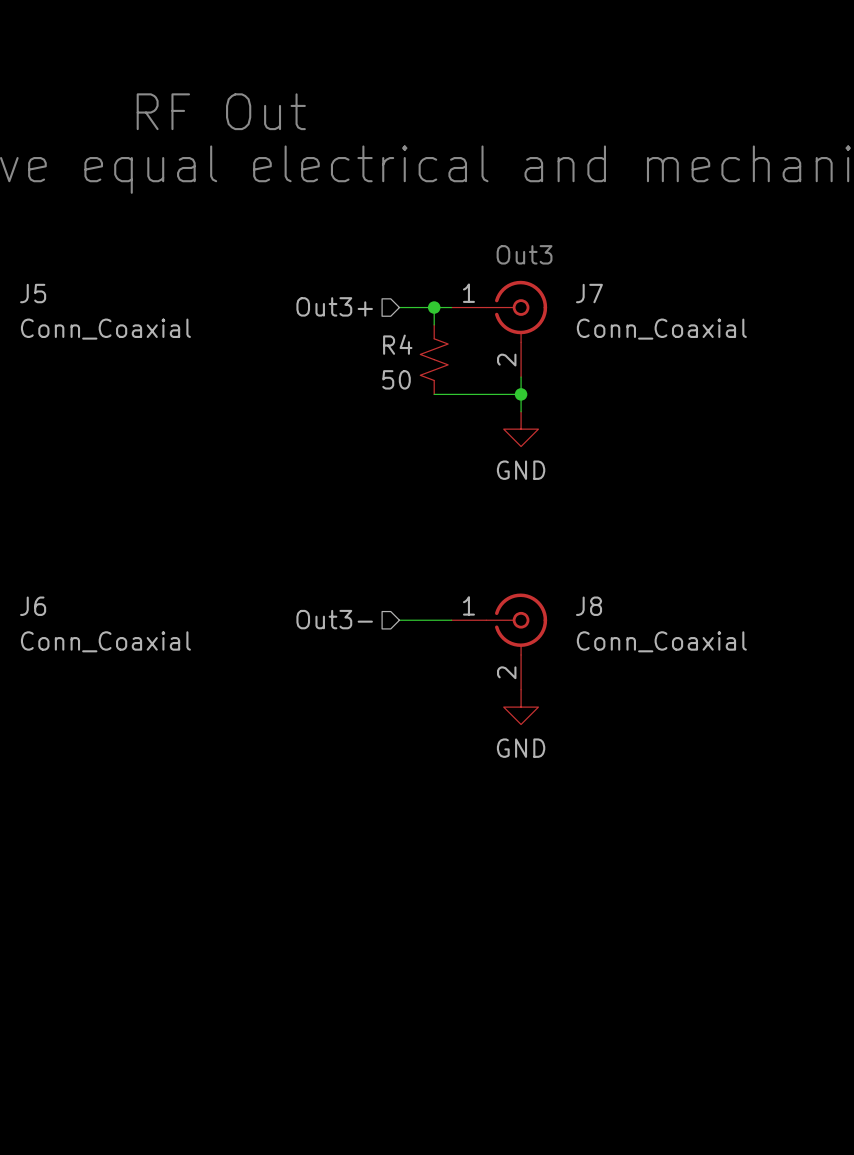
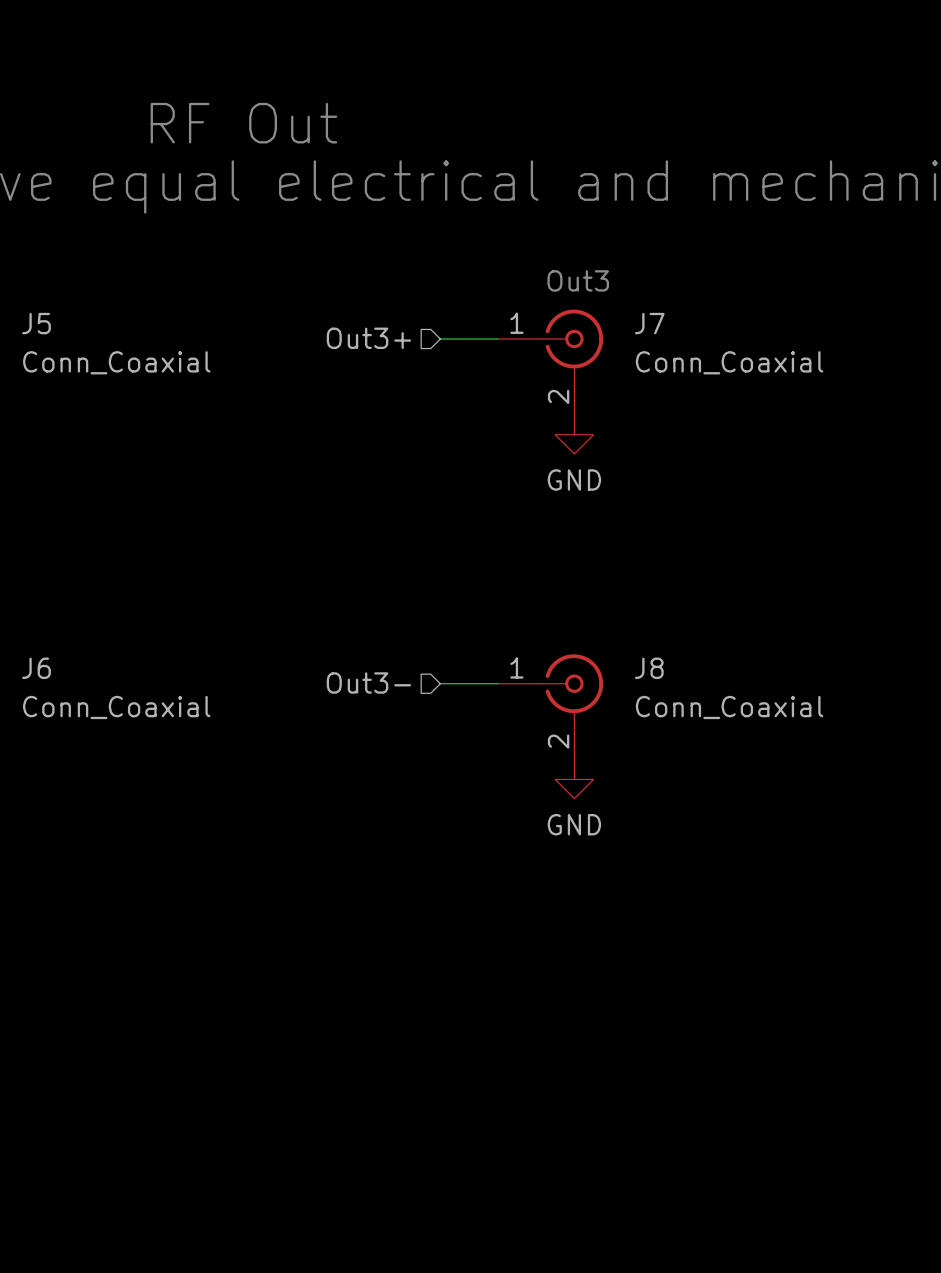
wire: (434, 307) (434, 324) -> none
junction: (434, 307) -> none
R4: 50 (434, 359) -> none
wire: (434, 394) (521, 394) -> none
junction: (521, 394) -> none
power symbol position: GND (521, 429) -> GND (574, 434)

